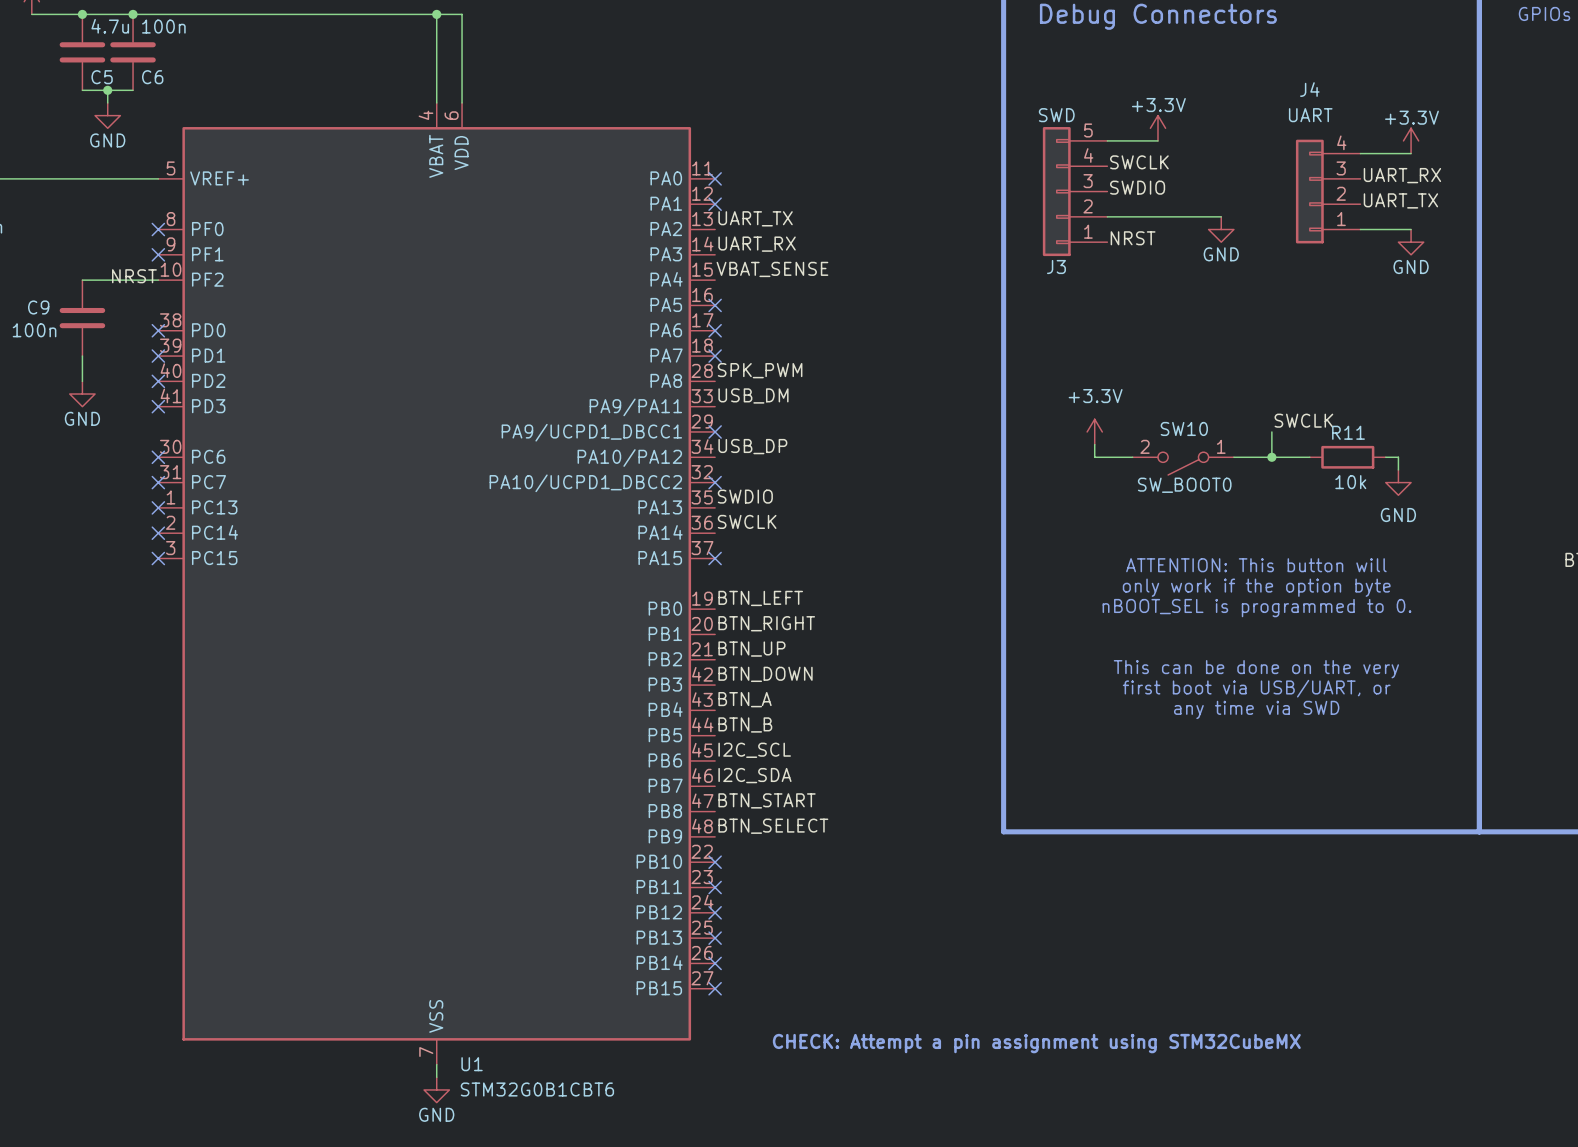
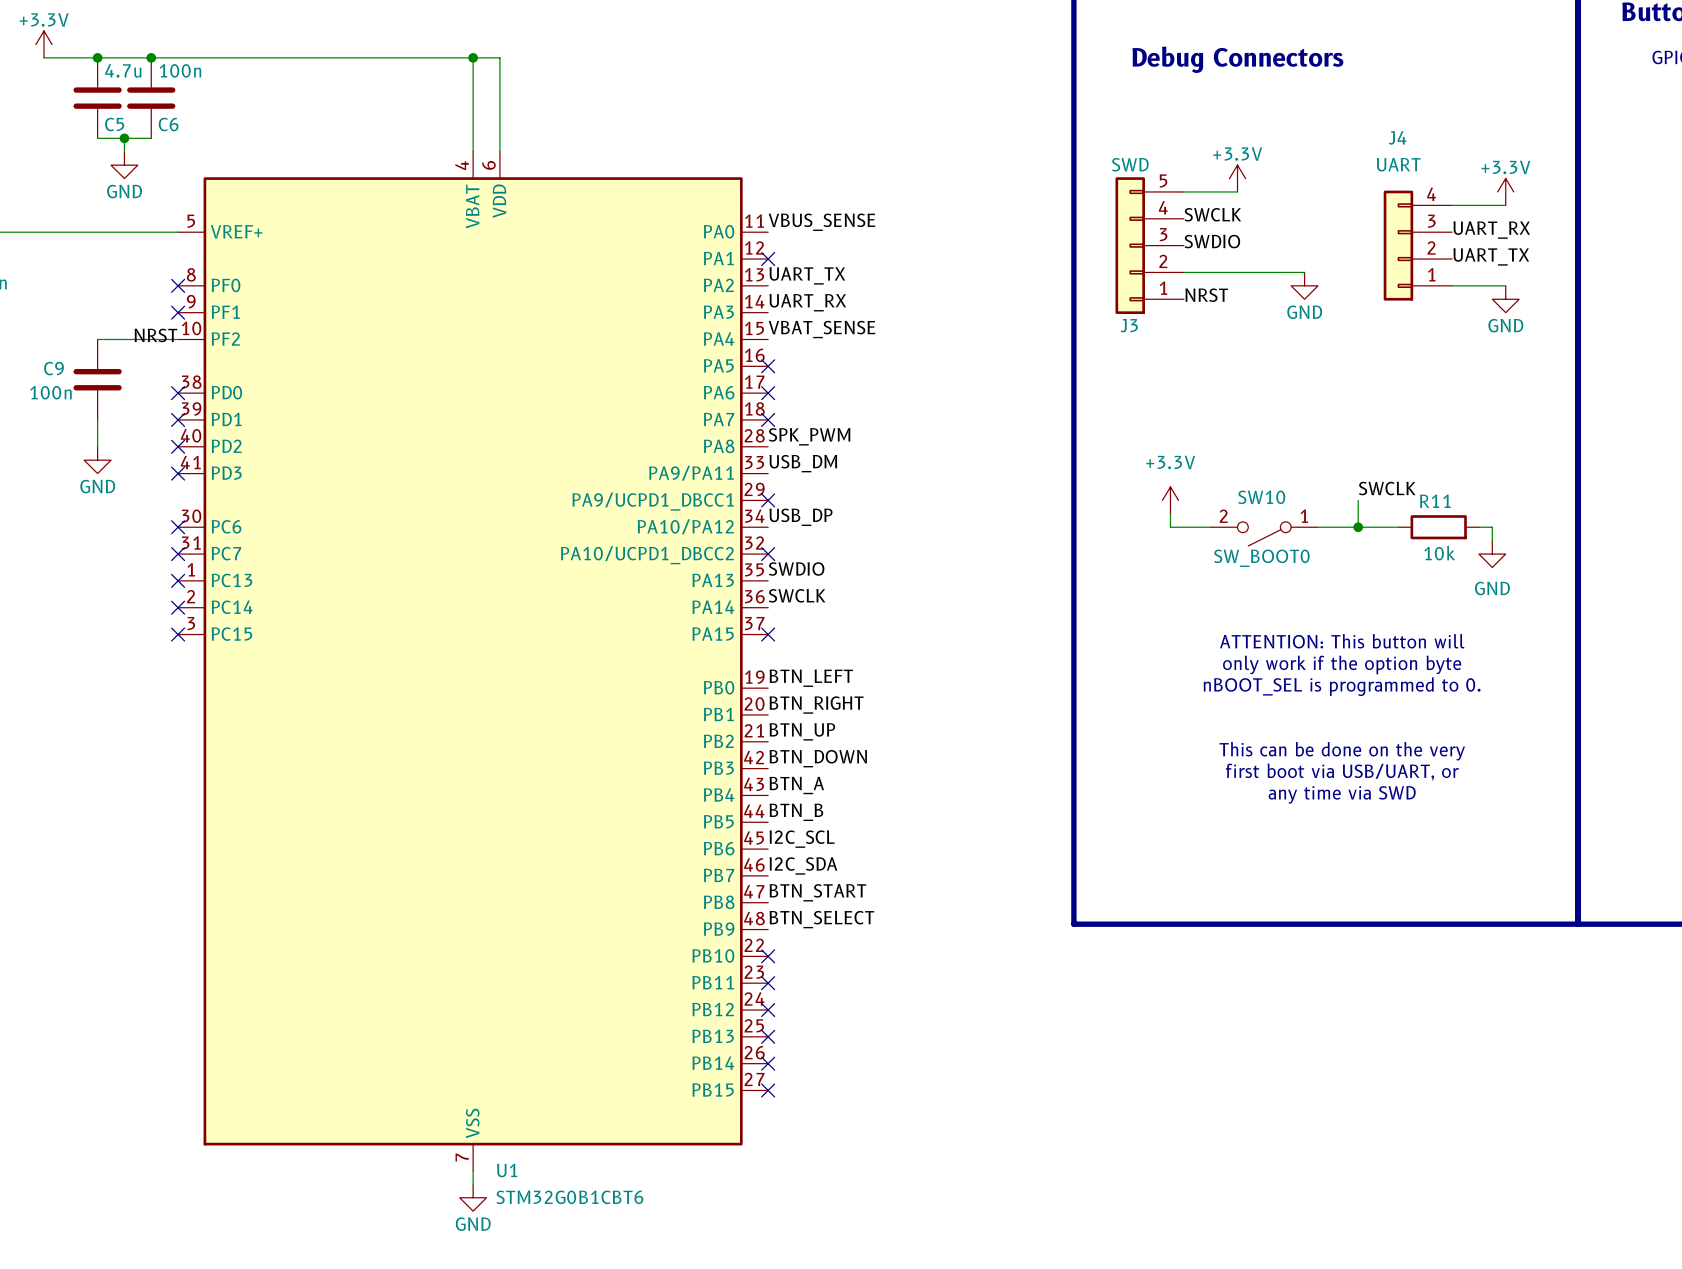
label: none -> VBUS_SENSE (822, 222)
no-connect mark: (715, 178) -> none
text: CHECK: Attempt a pin assignment using STM32CubeMX (1036, 1043) -> none

